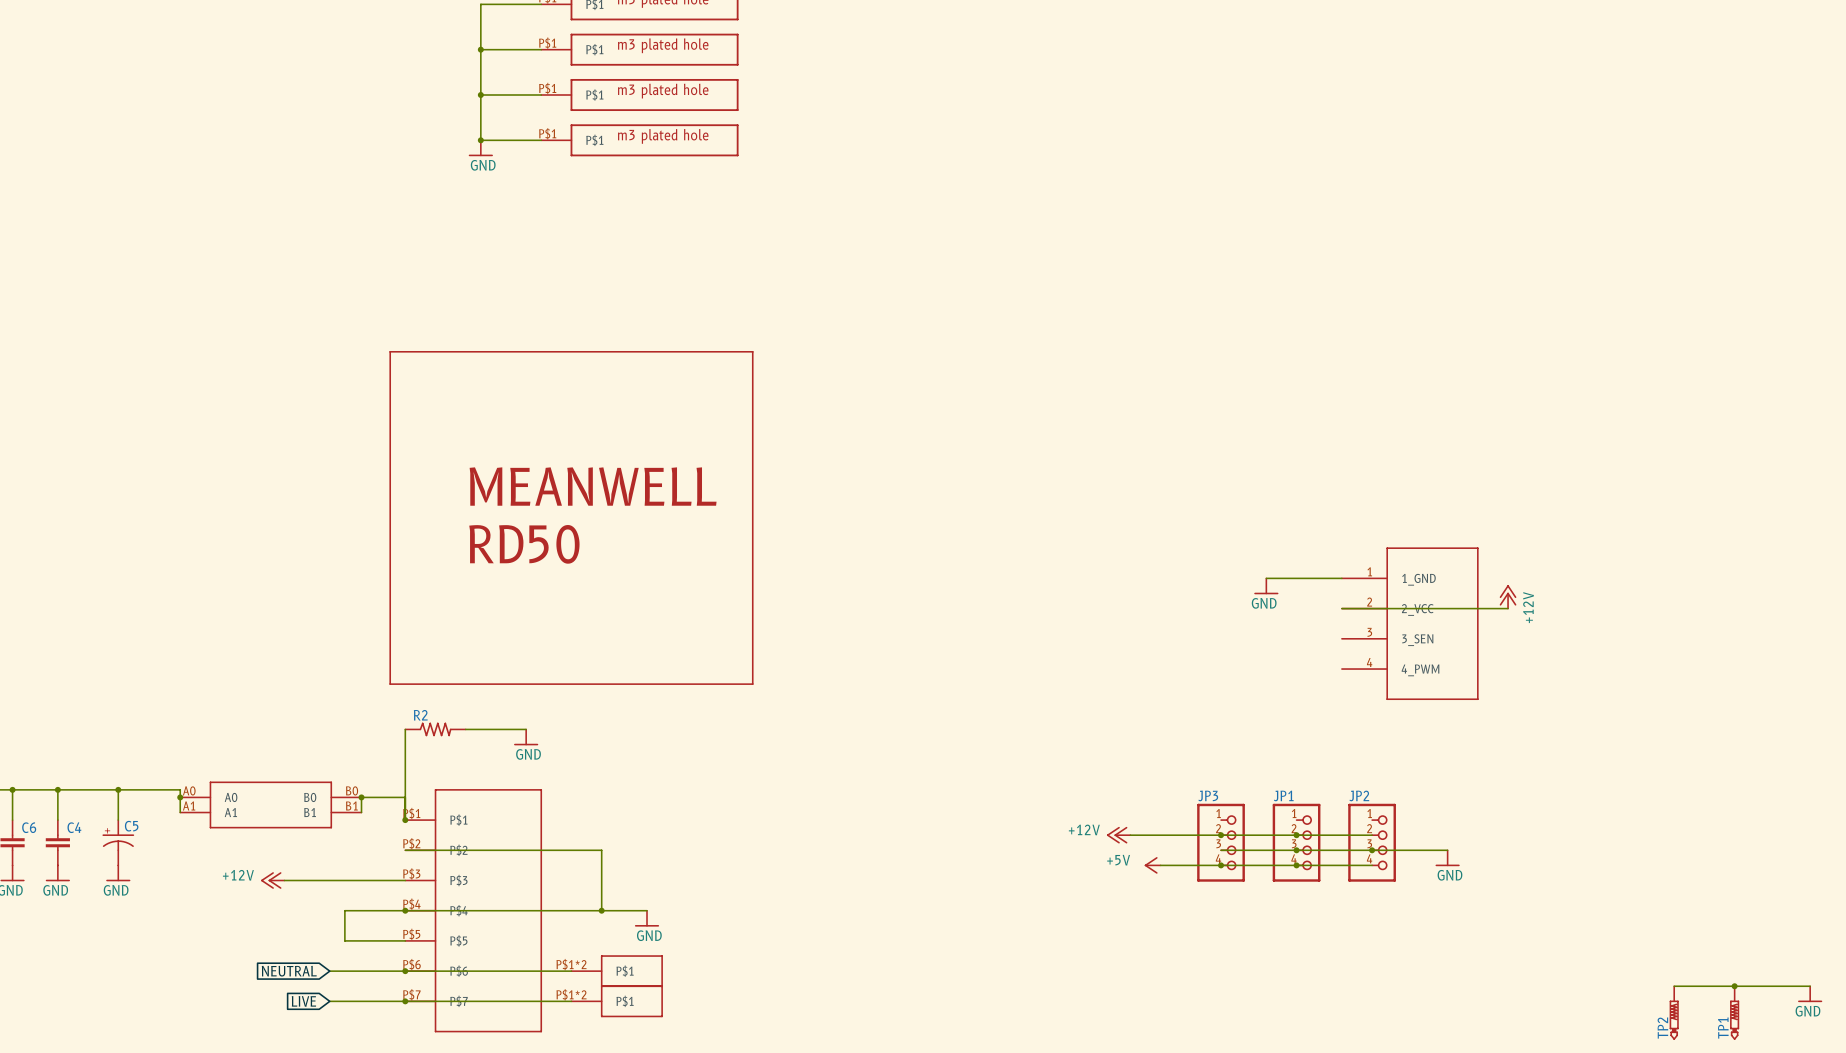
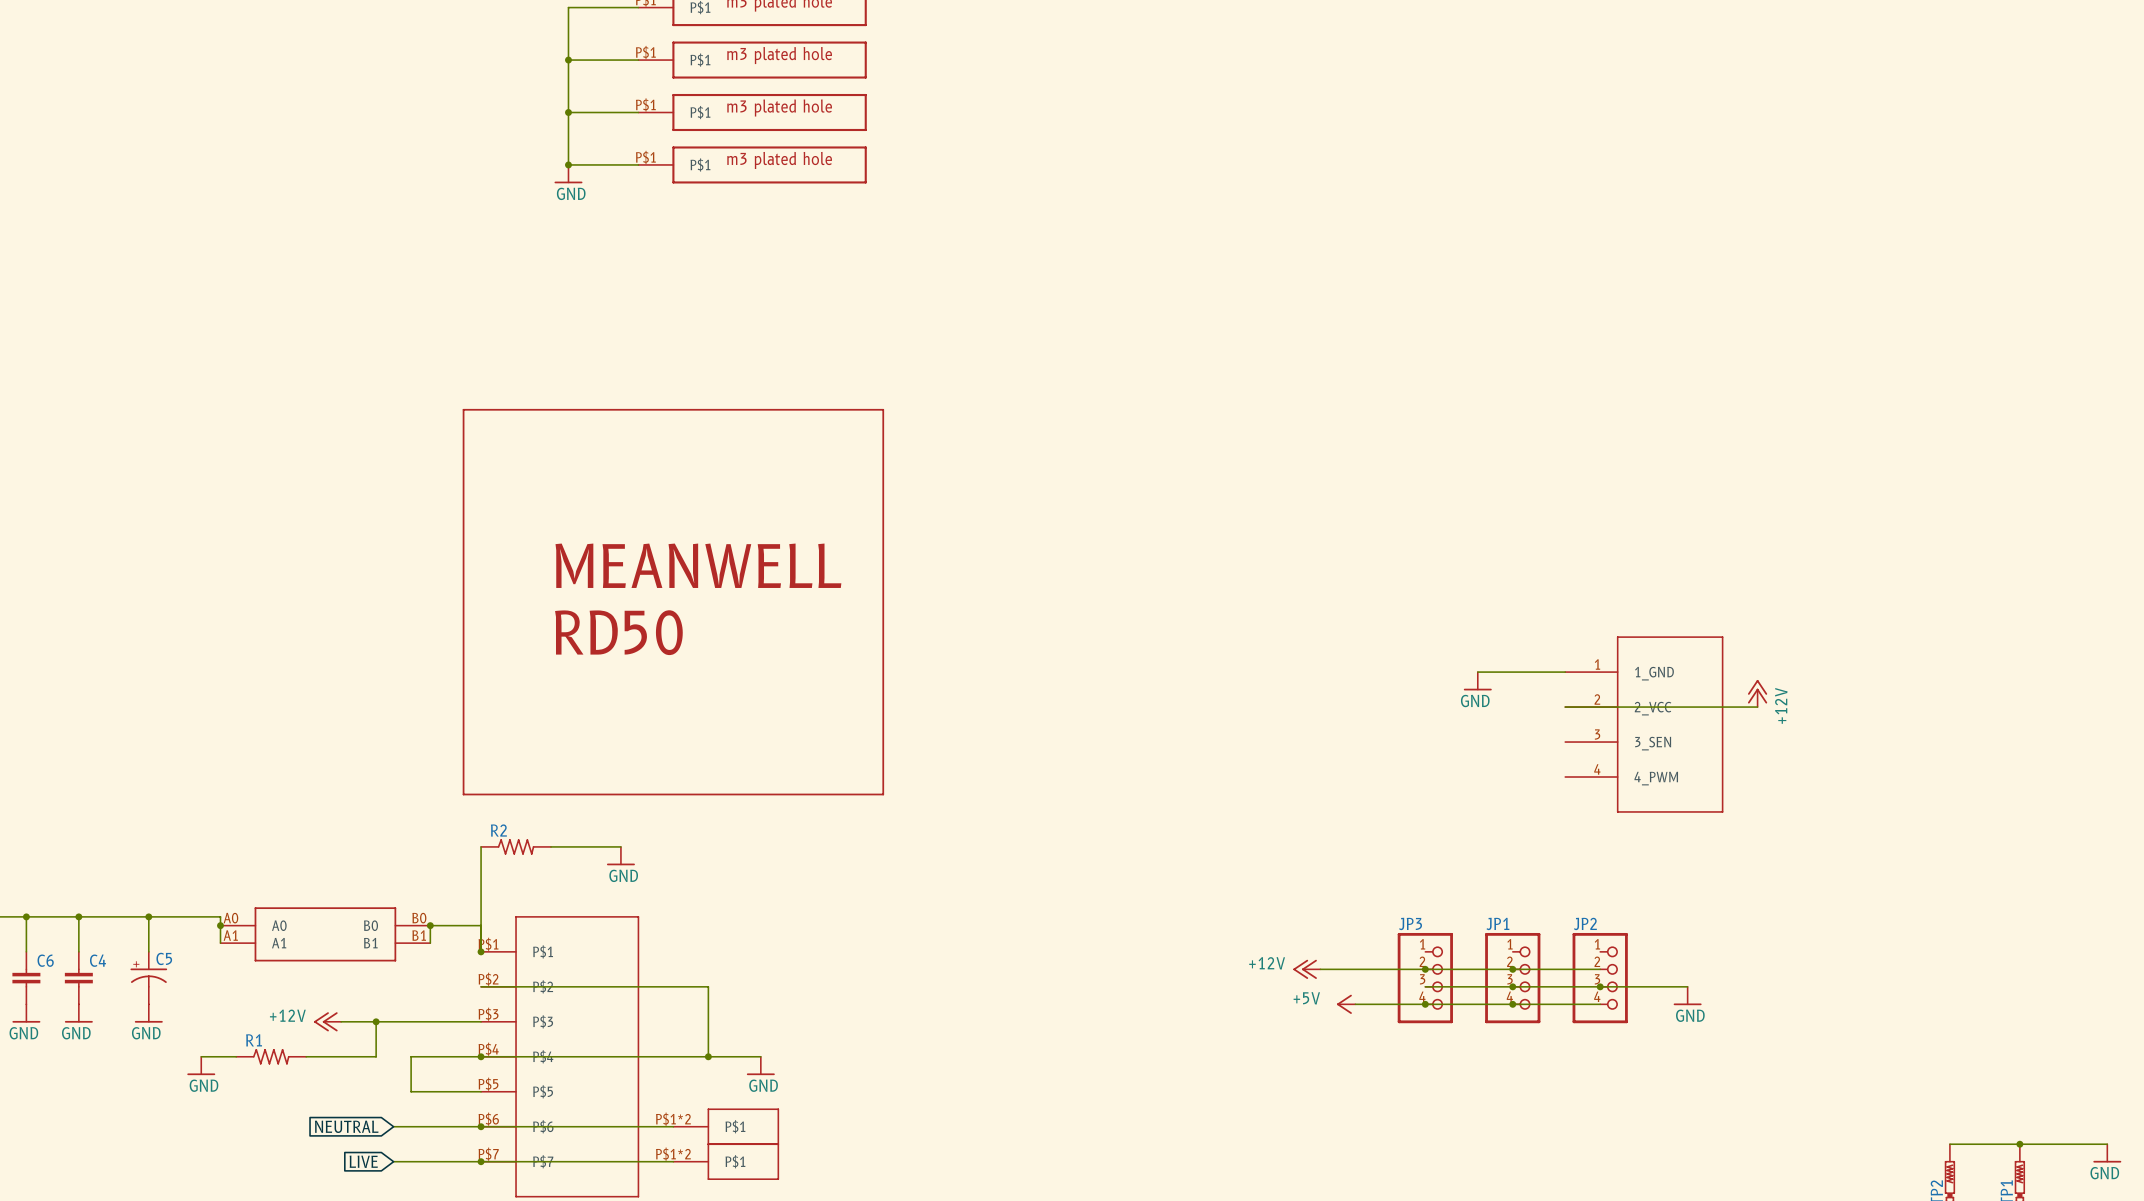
wire: none -> (376, 1021) (376, 1056) (306, 1056)
junction: none -> (376, 1021)
wire: none -> (201, 1056) (236, 1056)
R1: none -> (271, 1056)
power symbol: none -> GND (201, 1065)

